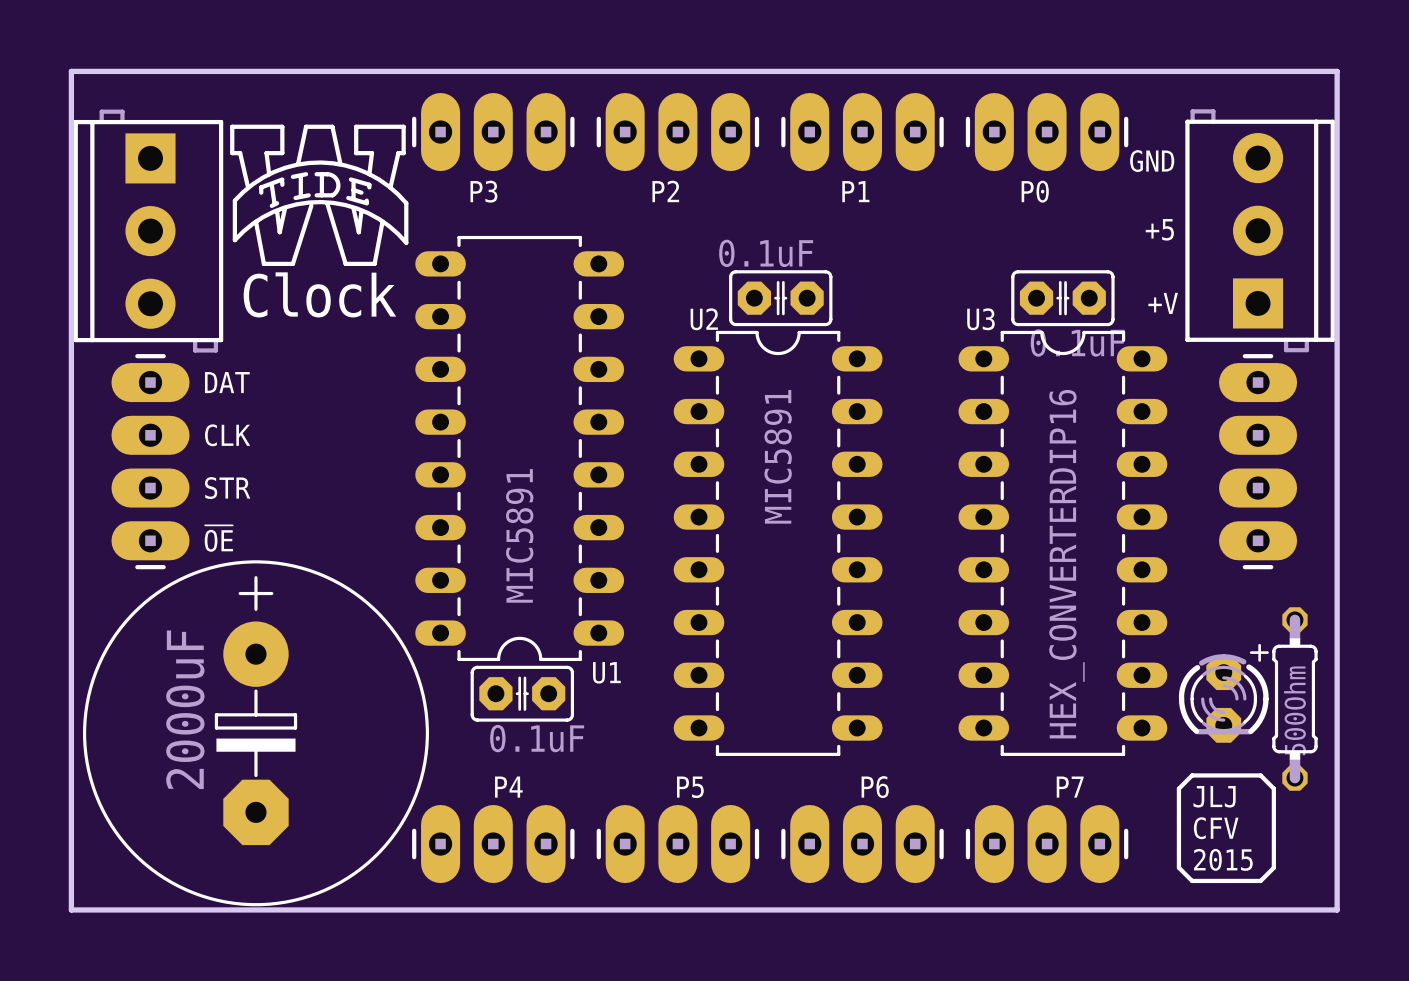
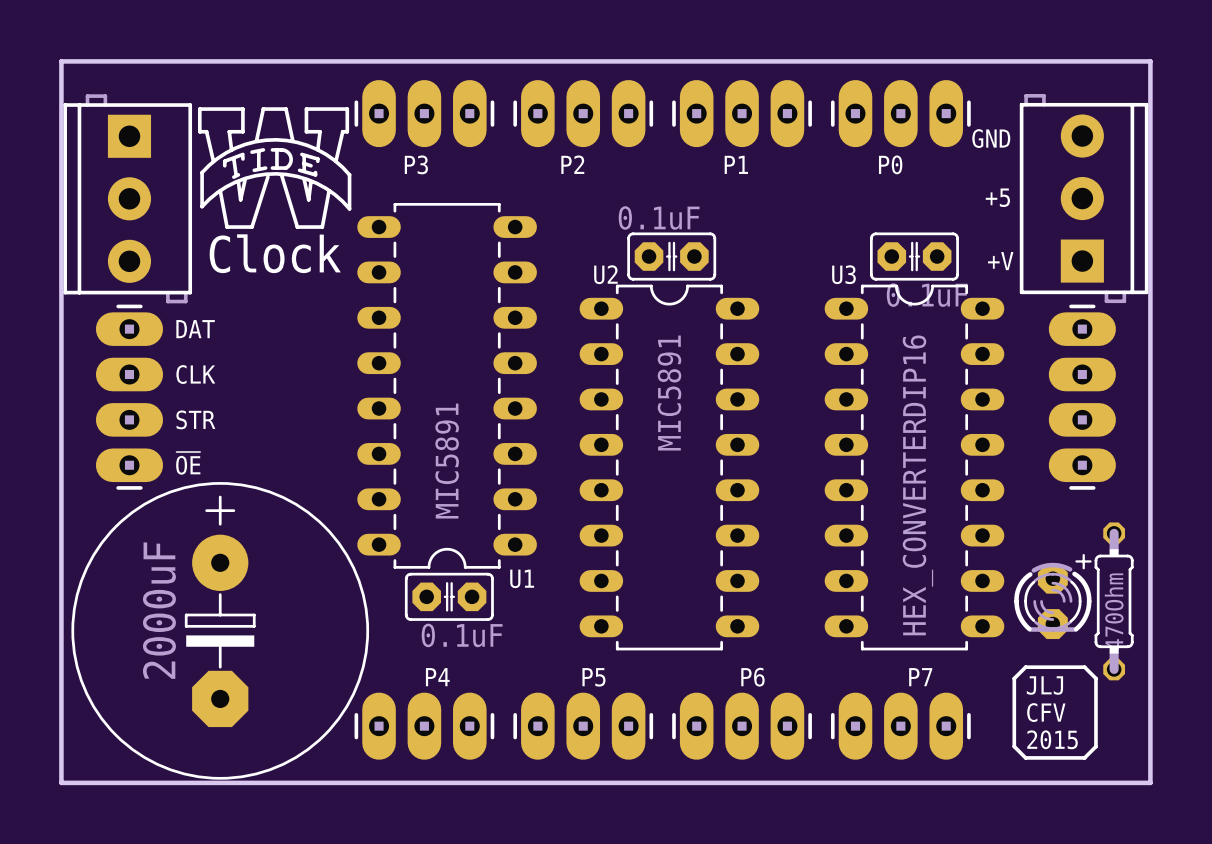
part value: 500Ohm (1294, 710) -> 470Ohm (1114, 611)

